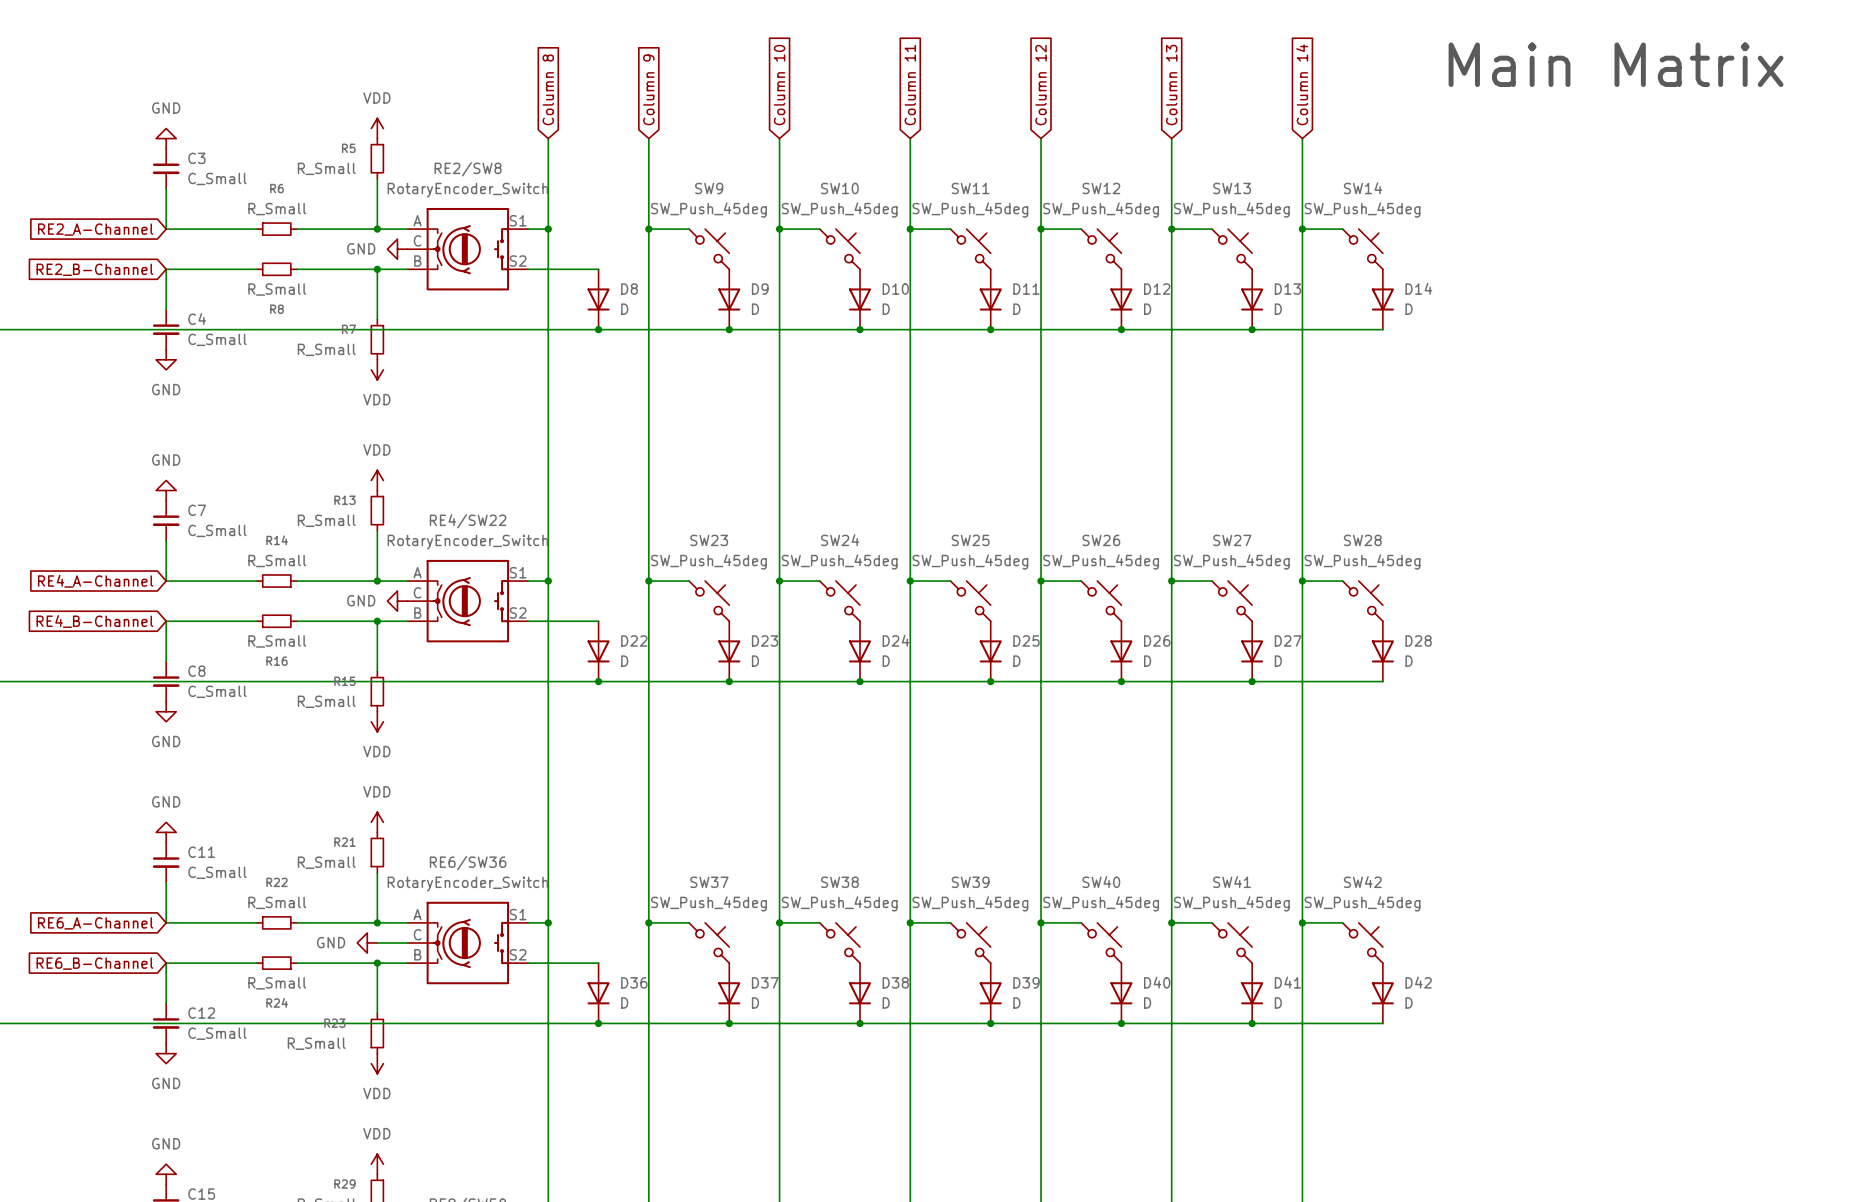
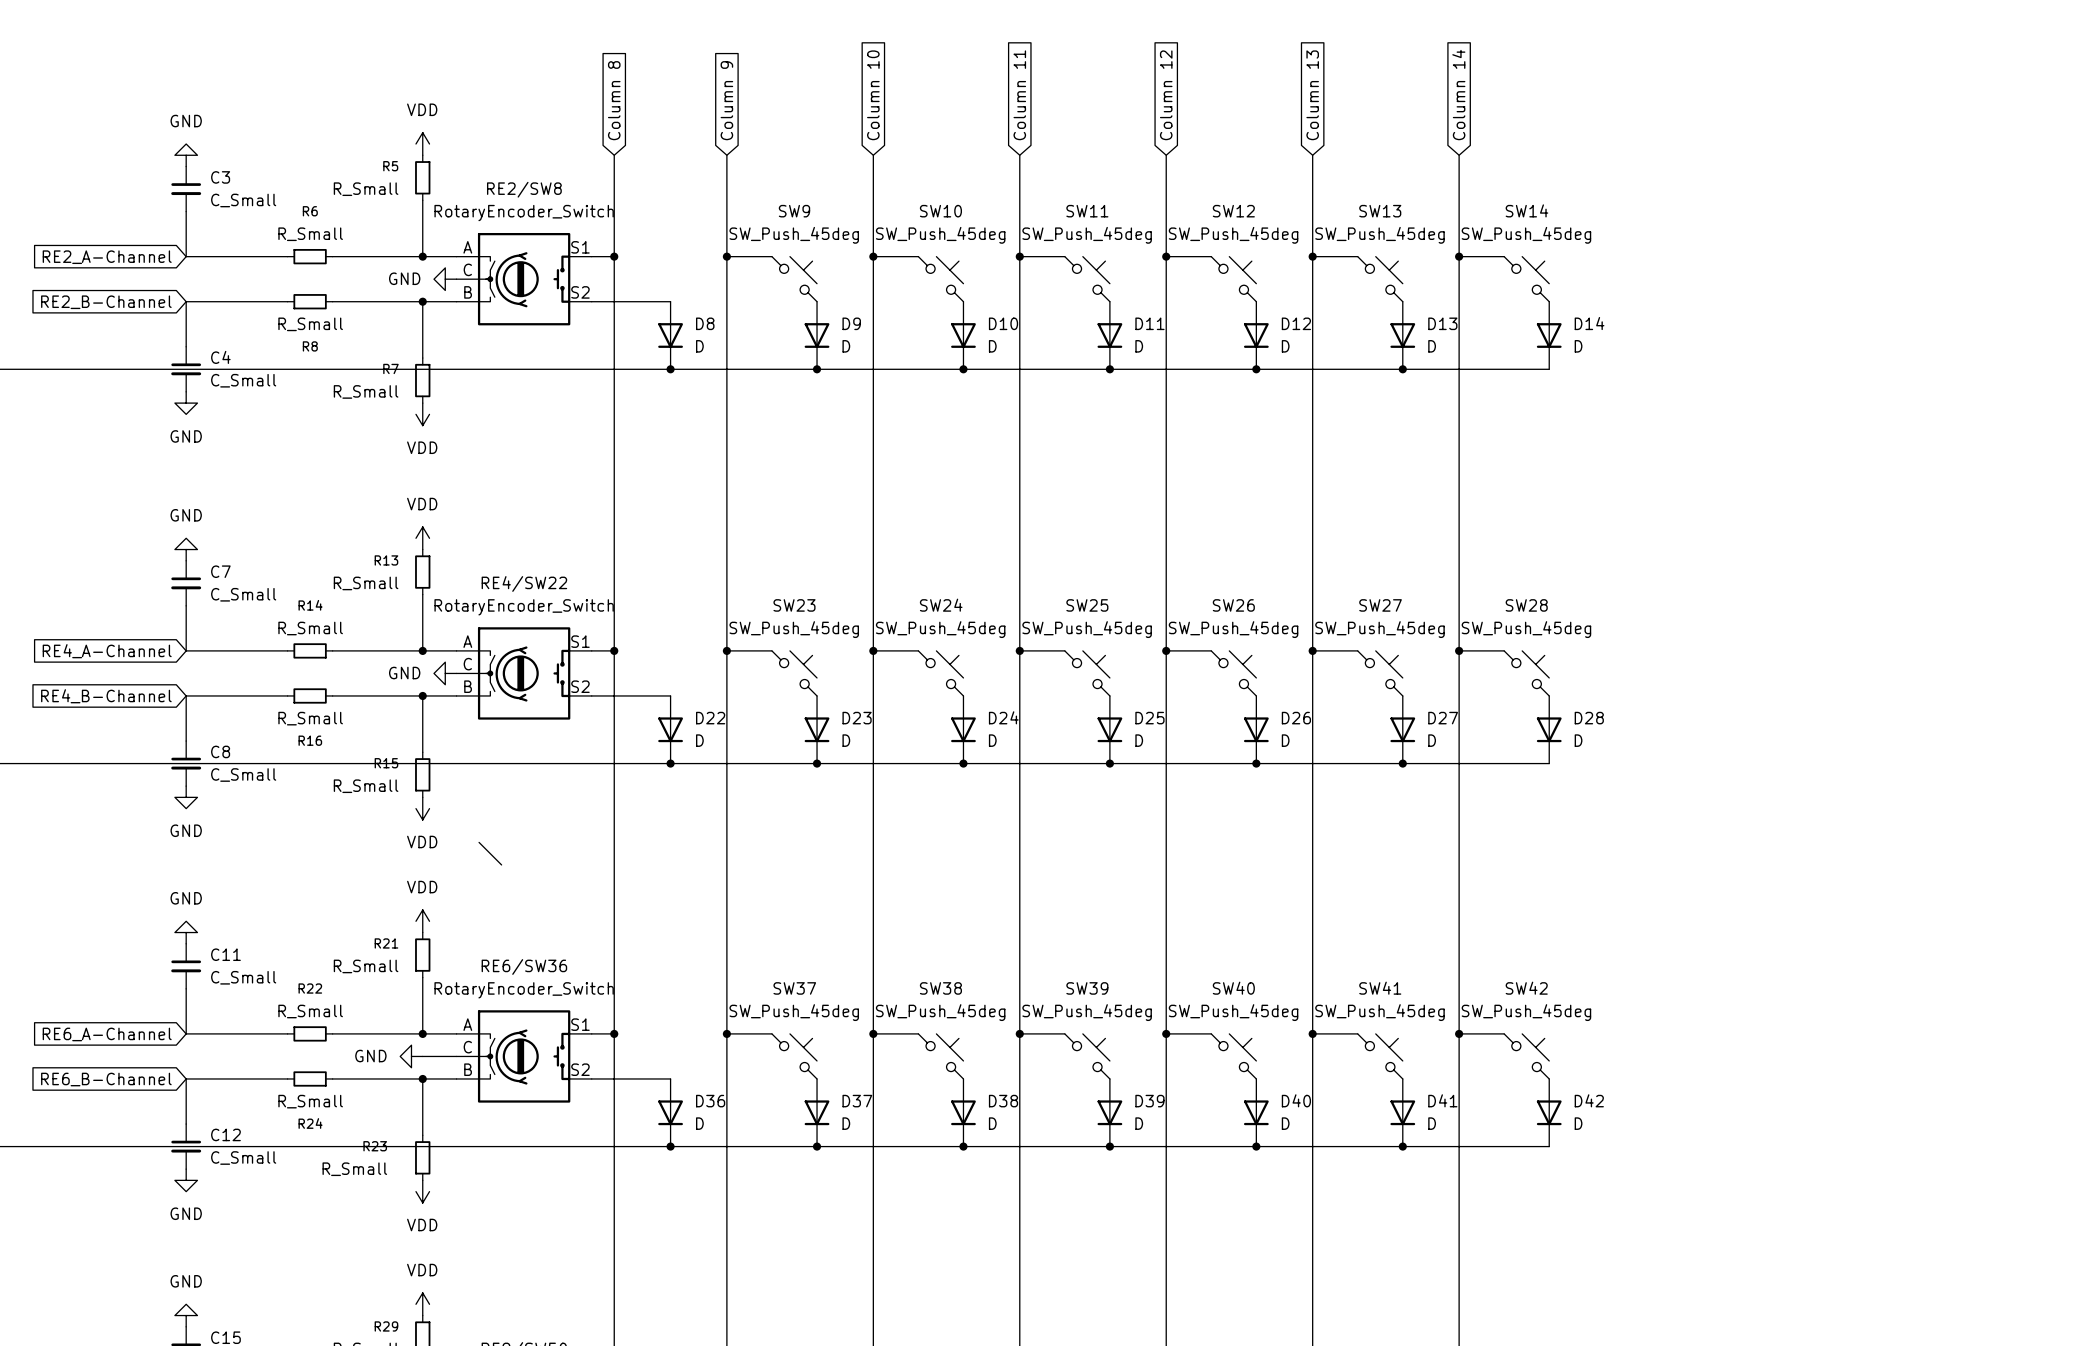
text: Main Matrix (1616, 64) -> none
wire: none -> (479, 842) (501, 864)

